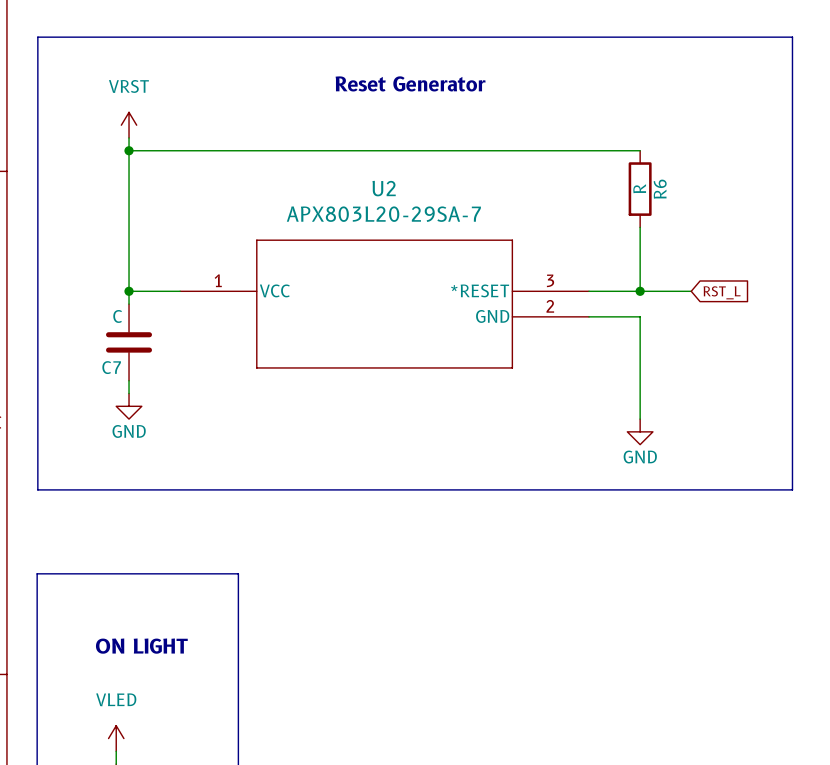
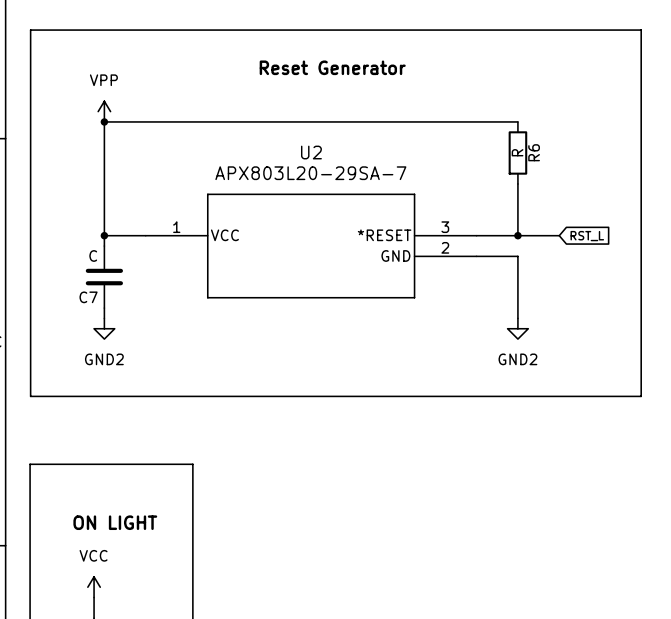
power symbol: VRST (129, 125) -> none
power symbol: none -> VPP (104, 111)
power symbol: GND (129, 406) -> GND2 (104, 328)
power symbol: none -> GND2 (517, 328)
power symbol: GND (640, 431) -> none
power symbol: none -> VCC (94, 587)
power symbol: VLED (116, 738) -> none

